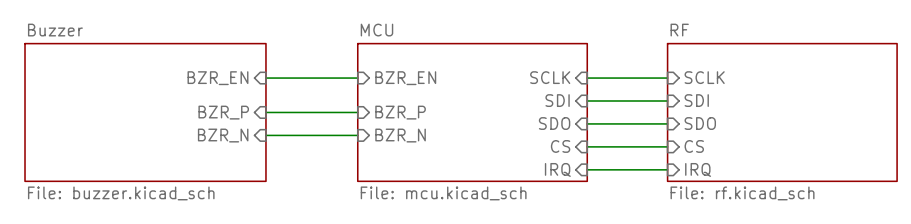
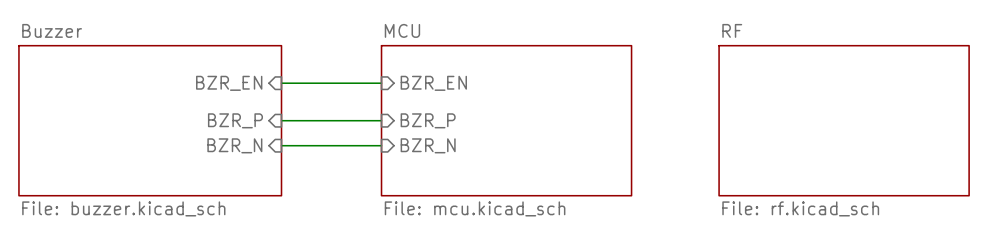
sheet pin: SCLK (550, 77) -> none
sheet pin: SCLK (704, 77) -> none
wire: (587, 78) (667, 78) -> none
sheet pin: SDI (557, 100) -> none
wire: (587, 100) (667, 100) -> none
sheet pin: SDI (696, 100) -> none
sheet pin: SDO (554, 123) -> none
wire: (587, 123) (667, 123) -> none
sheet pin: SDO (700, 123) -> none
sheet pin: CS (560, 146) -> none
wire: (587, 146) (667, 146) -> none
sheet pin: CS (694, 146) -> none
sheet pin: IRQ (557, 169) -> none
wire: (587, 169) (667, 169) -> none
sheet pin: IRQ (698, 169) -> none

